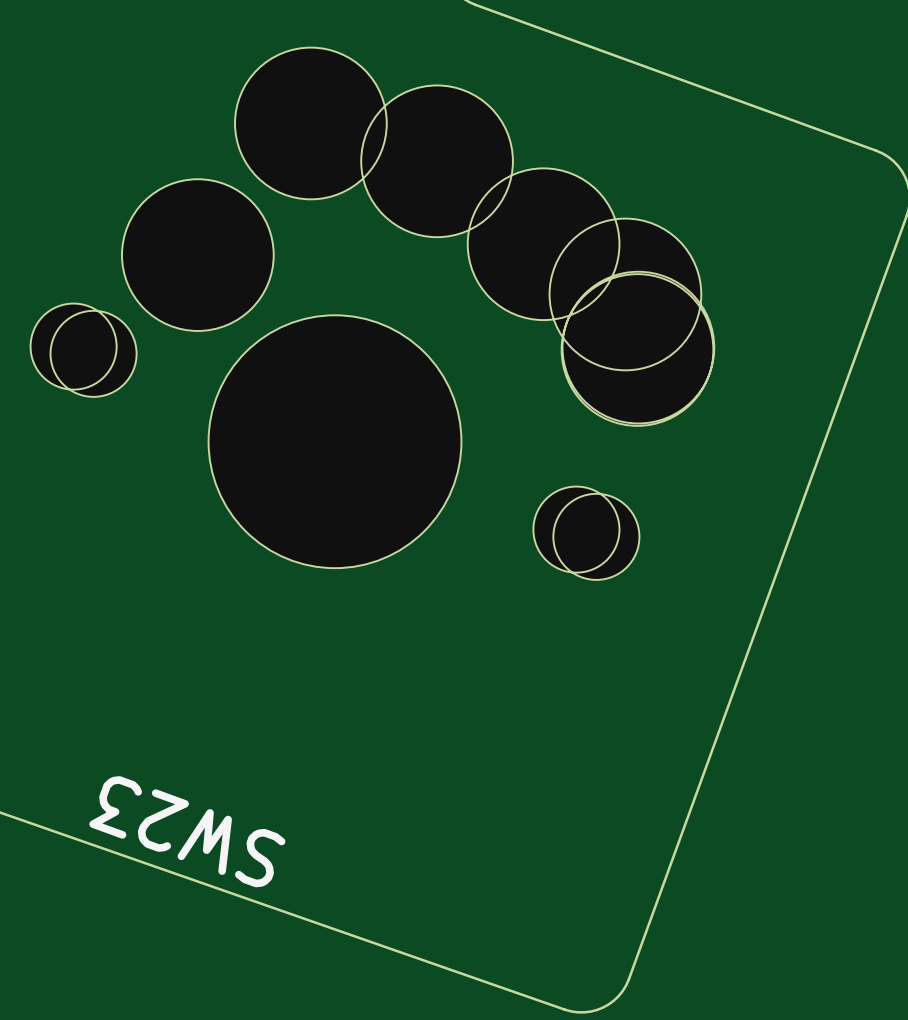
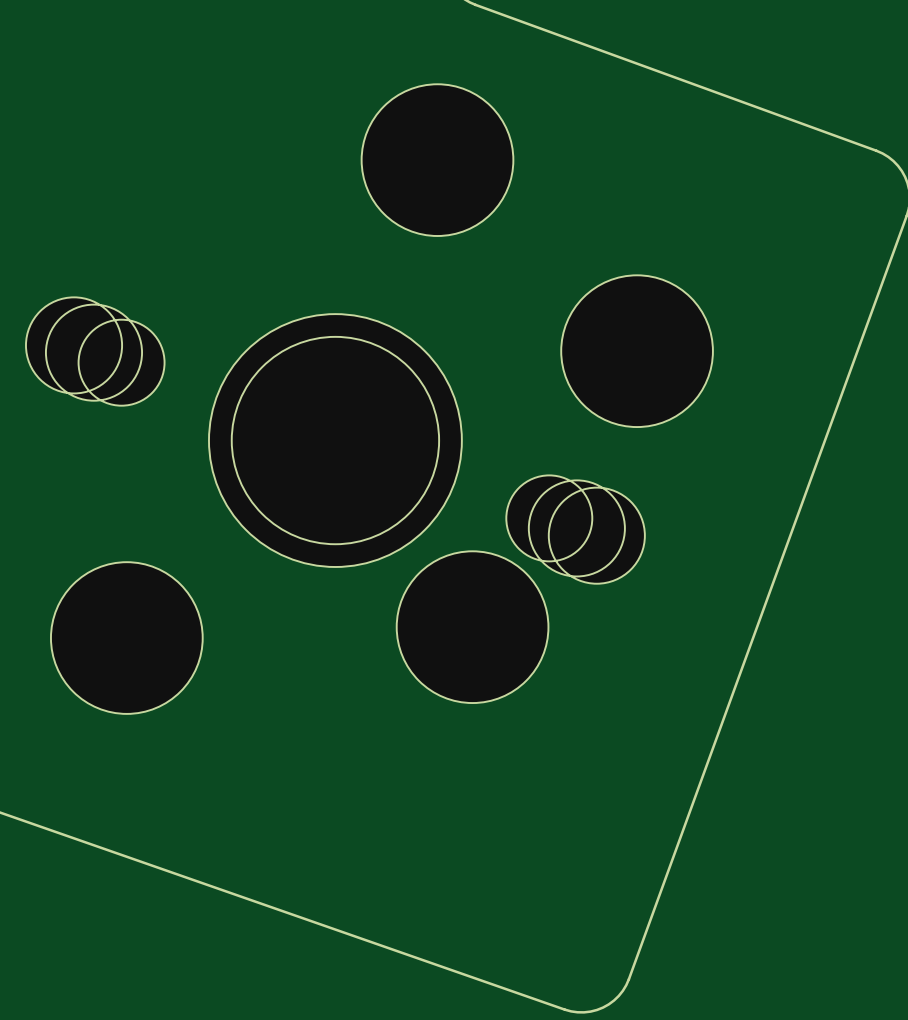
SW23: (372, 313) -> none
part: none -> (369, 399)

